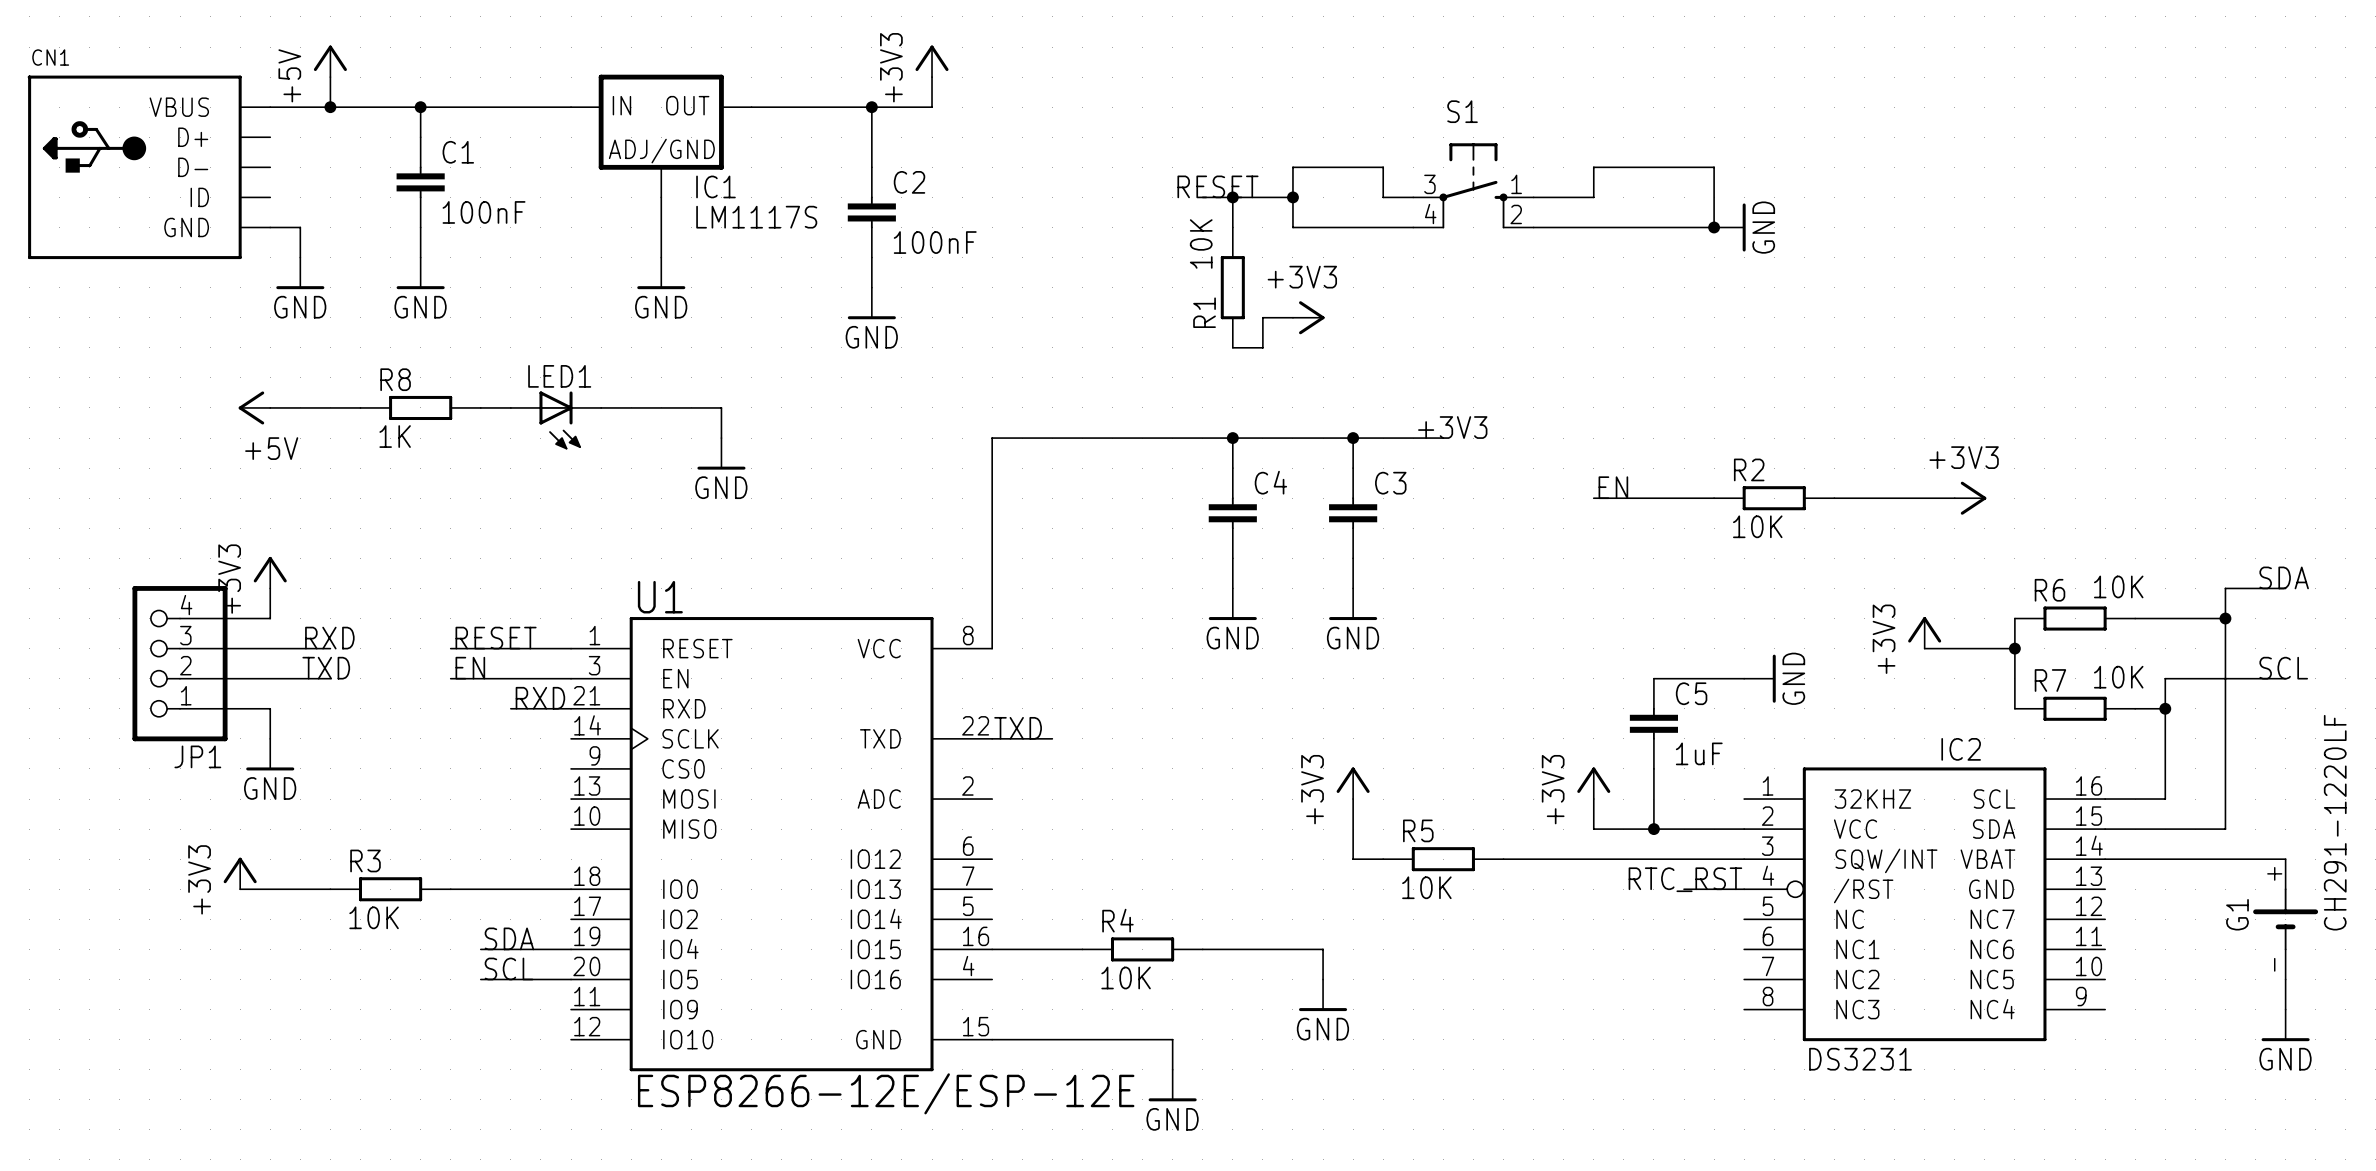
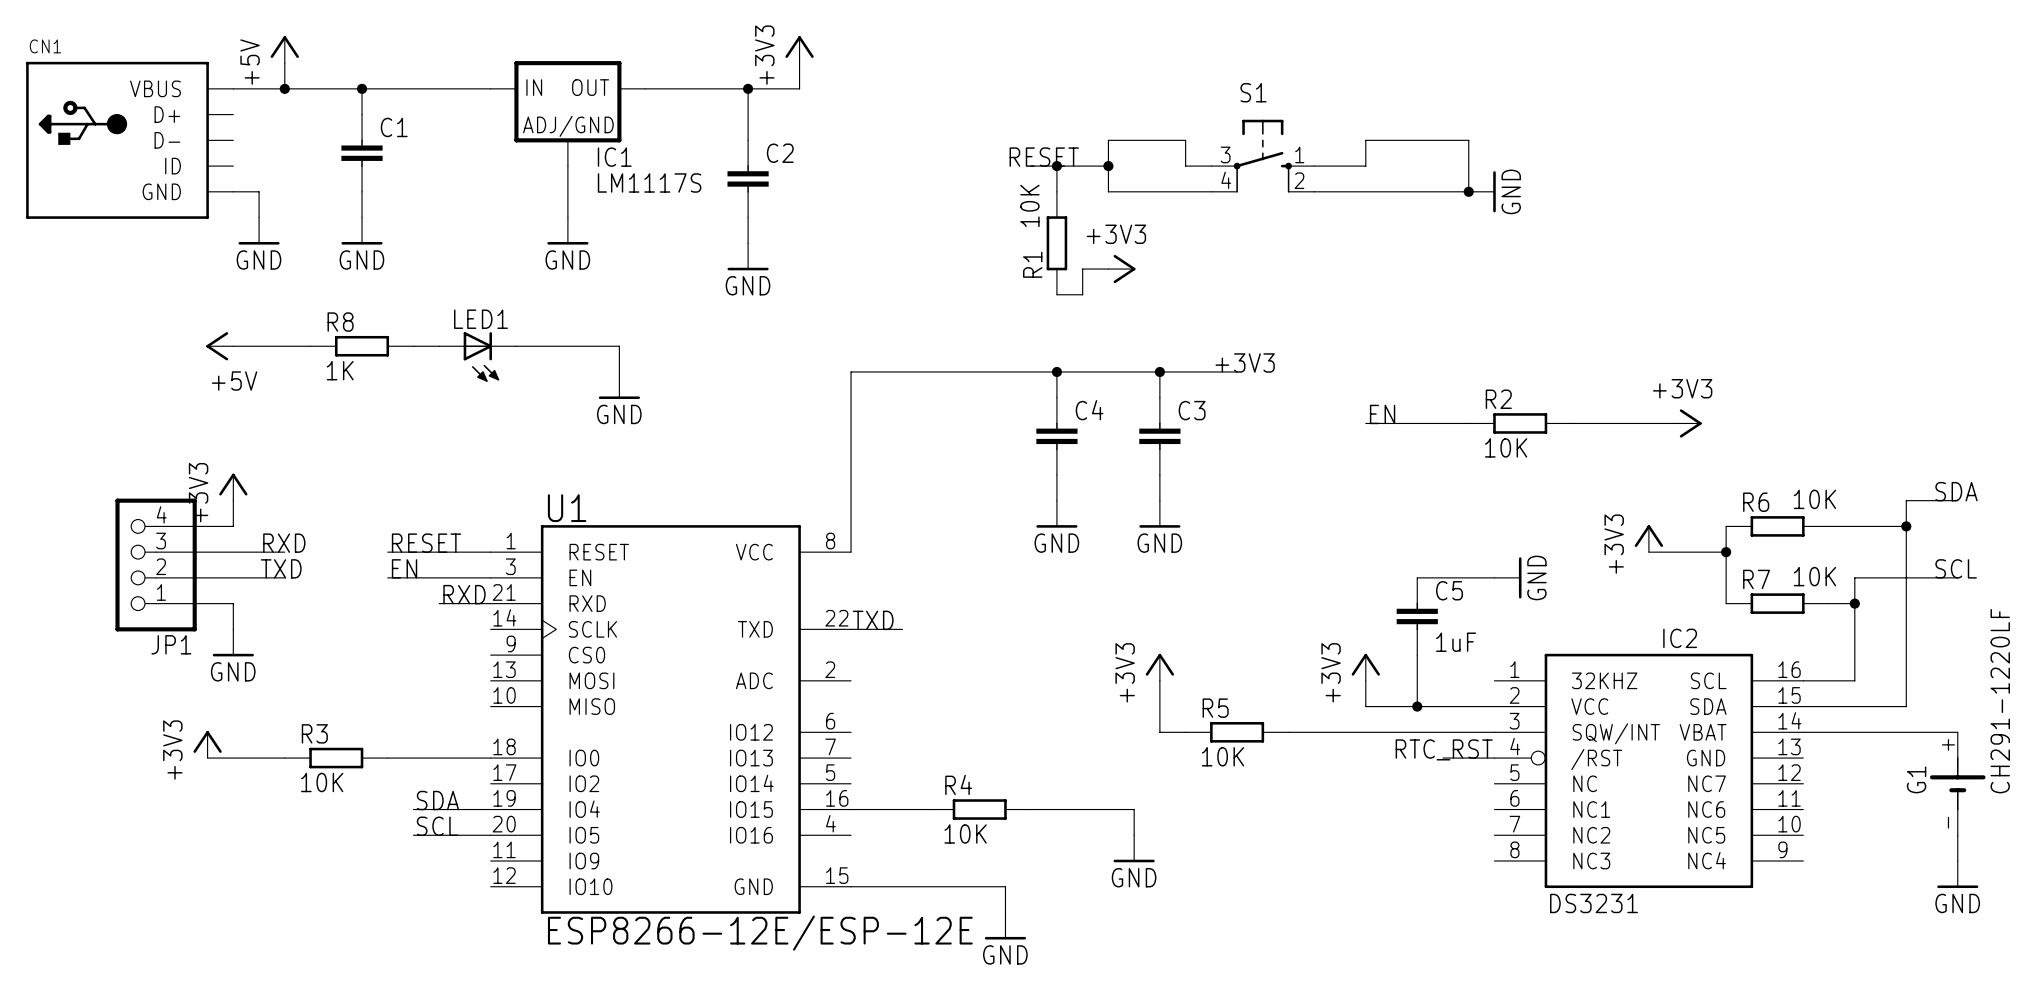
C1 value: 100nF (484, 212) -> none
C2 value: 100nF (935, 242) -> none

